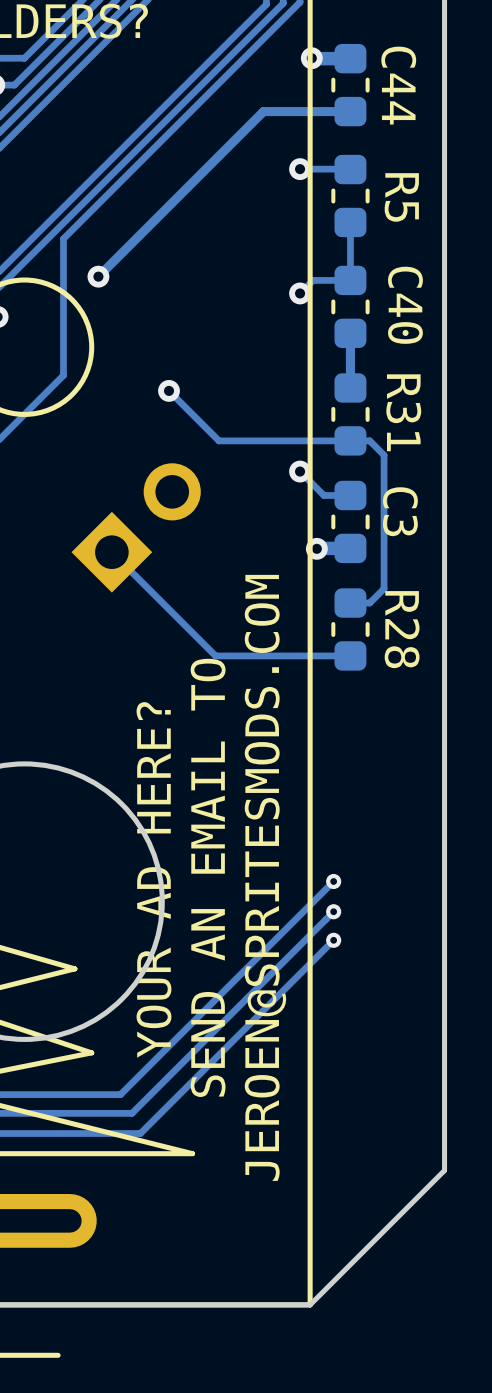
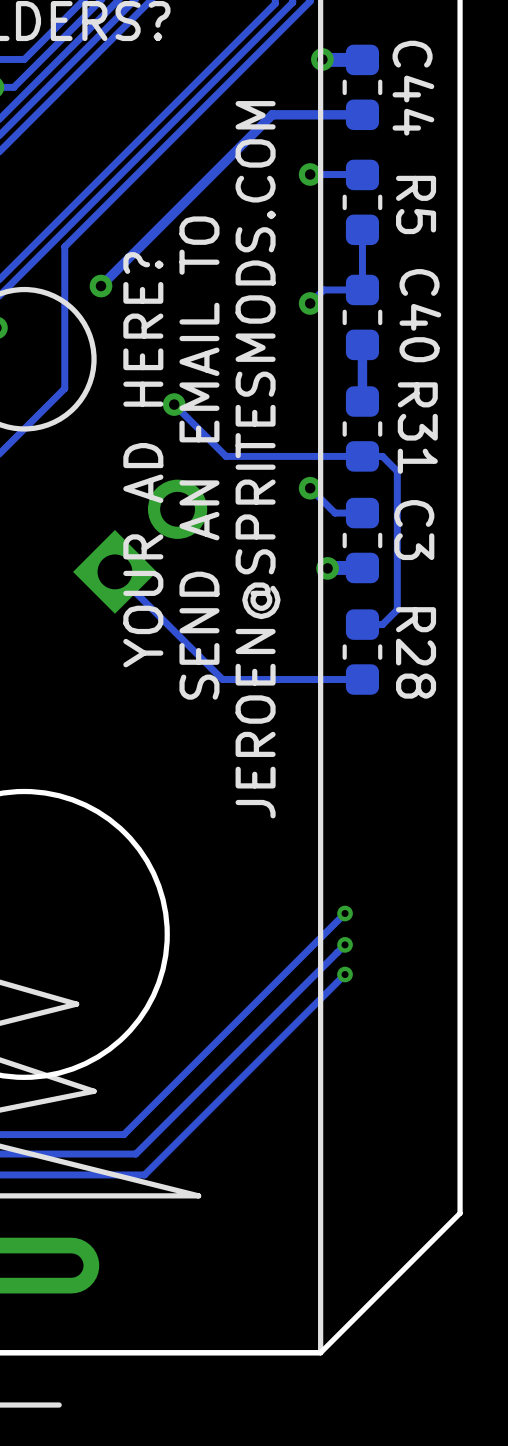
text position: SEND AN EMAIL TO (208, 877) -> SEND AN EMAIL TO (199, 458)
text position: JEROEN@SPRITESMODS.COM (265, 877) -> JEROEN@SPRITESMODS.COM (258, 459)
text position: YOUR AD HERE? (154, 879) -> YOUR AD HERE? (143, 459)

